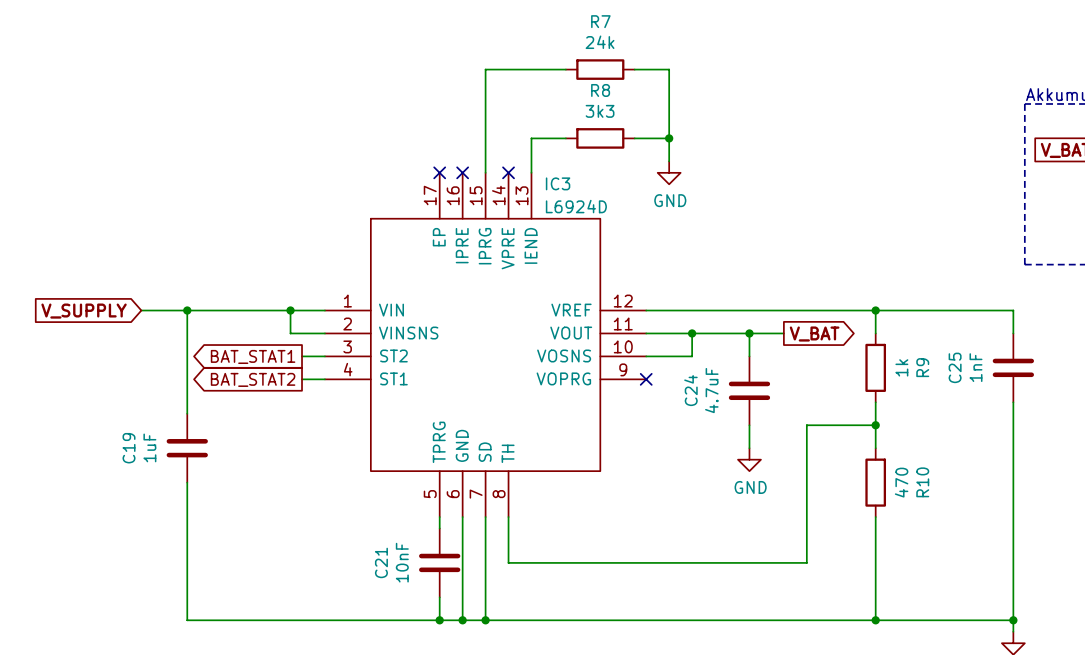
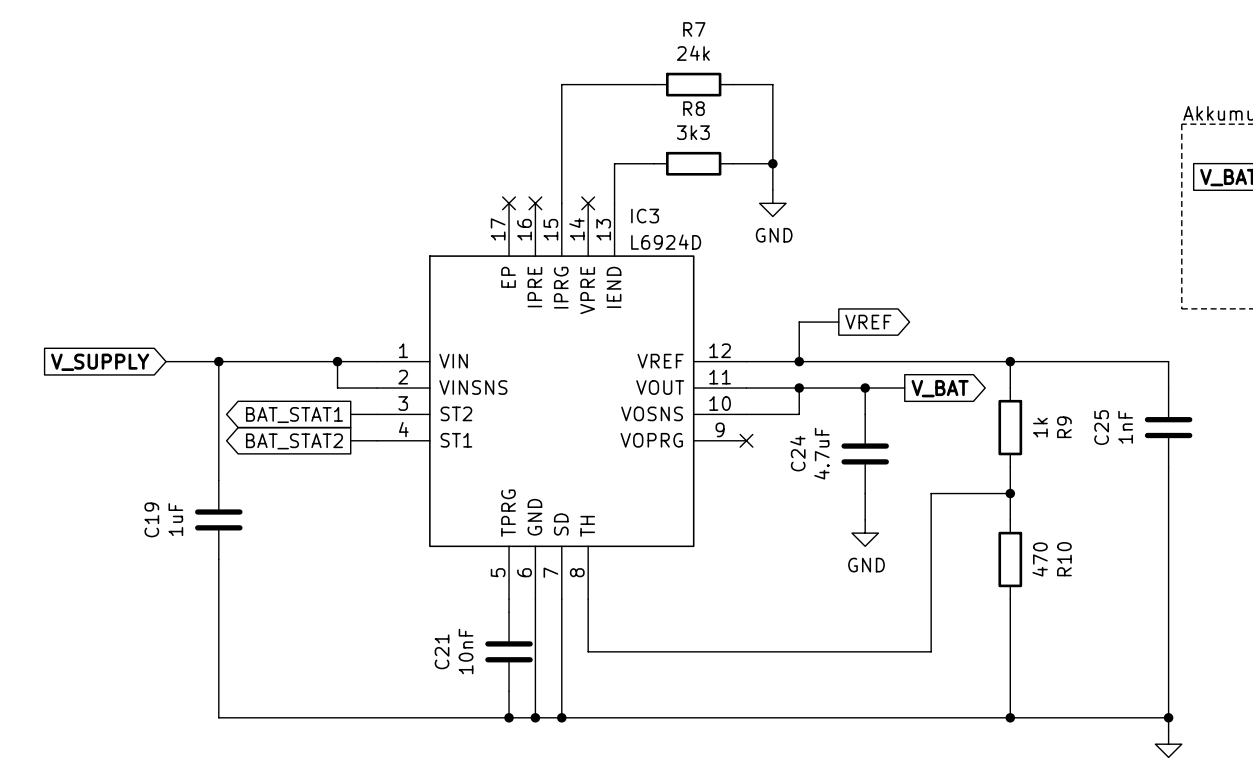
wire: none -> (838, 322) (799, 322) (799, 361)
global label: none -> VREF (868, 322)
junction: none -> (799, 361)

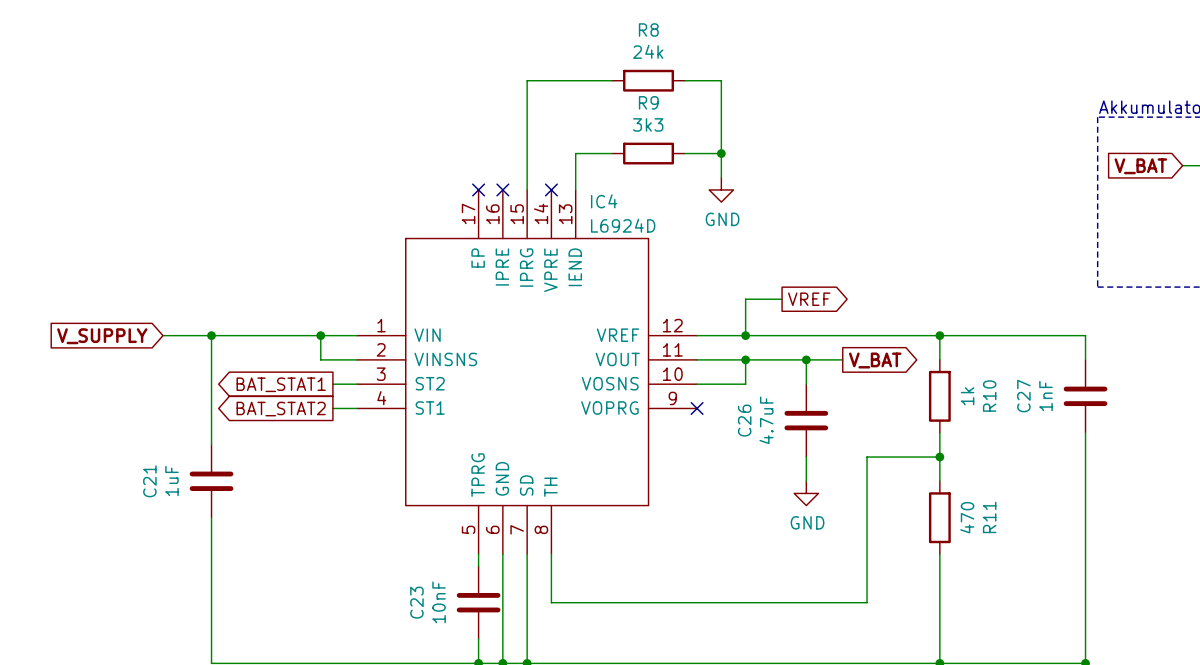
R7 name: R7 (694, 29) -> R8 (648, 30)
R8 name: R8 (694, 108) -> R9 (648, 102)
IC3 name: IC3 (645, 216) -> IC4 (604, 201)
R9 name: R9 (1064, 427) -> R10 (989, 396)
C25 name: C25 (1101, 427) -> C27 (1023, 396)
C24 name: C24 (797, 453) -> C26 (744, 420)
C19 name: C19 (151, 519) -> C21 (149, 481)
R10 name: R10 (1064, 559) -> R11 (989, 517)
C21 name: C21 (442, 651) -> C23 (416, 602)

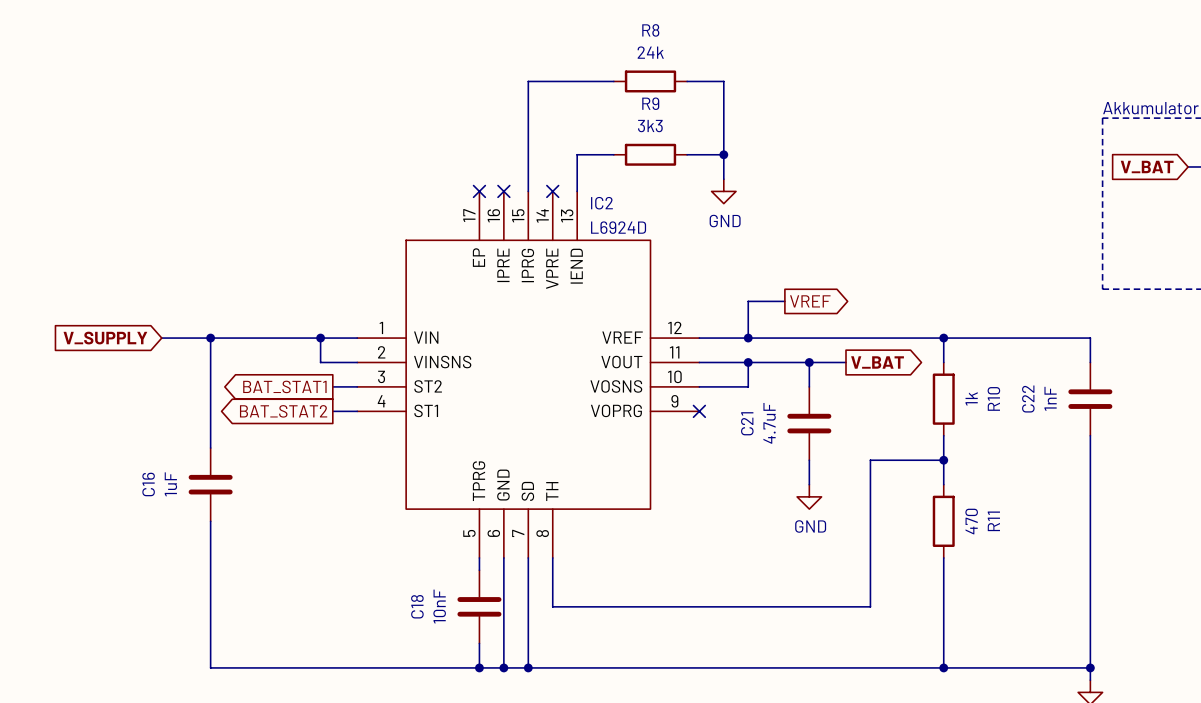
IC4 name: IC4 (604, 201) -> IC2 (601, 203)
C27 name: C27 (1023, 396) -> C22 (1028, 399)
C26 name: C26 (744, 420) -> C21 (747, 423)
C21 name: C21 (149, 481) -> C16 (148, 484)
C23 name: C23 (416, 602) -> C18 (417, 606)

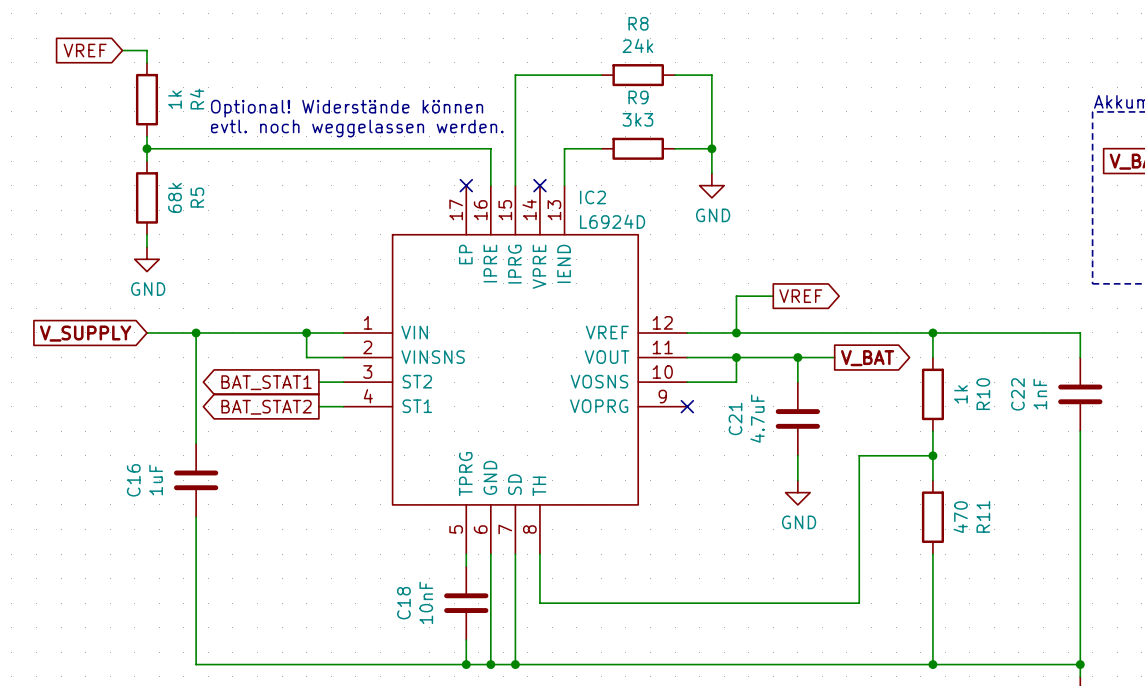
global label: none -> VREF (85, 50)
wire: none -> (122, 50) (146, 50) (146, 62)
R4: none -> 1k (146, 99)
text: none -> Optional! Widerstände können (347, 108)
text: none -> evtl. noch weggelassen werden. (357, 128)
wire: none -> (146, 136) (146, 161)
wire: none -> (146, 148) (490, 148) (490, 185)
junction: none -> (146, 148)
no-connect mark: (503, 191) -> none
R5: none -> 68k (146, 197)
wire: none -> (146, 234) (146, 247)
power symbol: none -> GND (146, 259)

